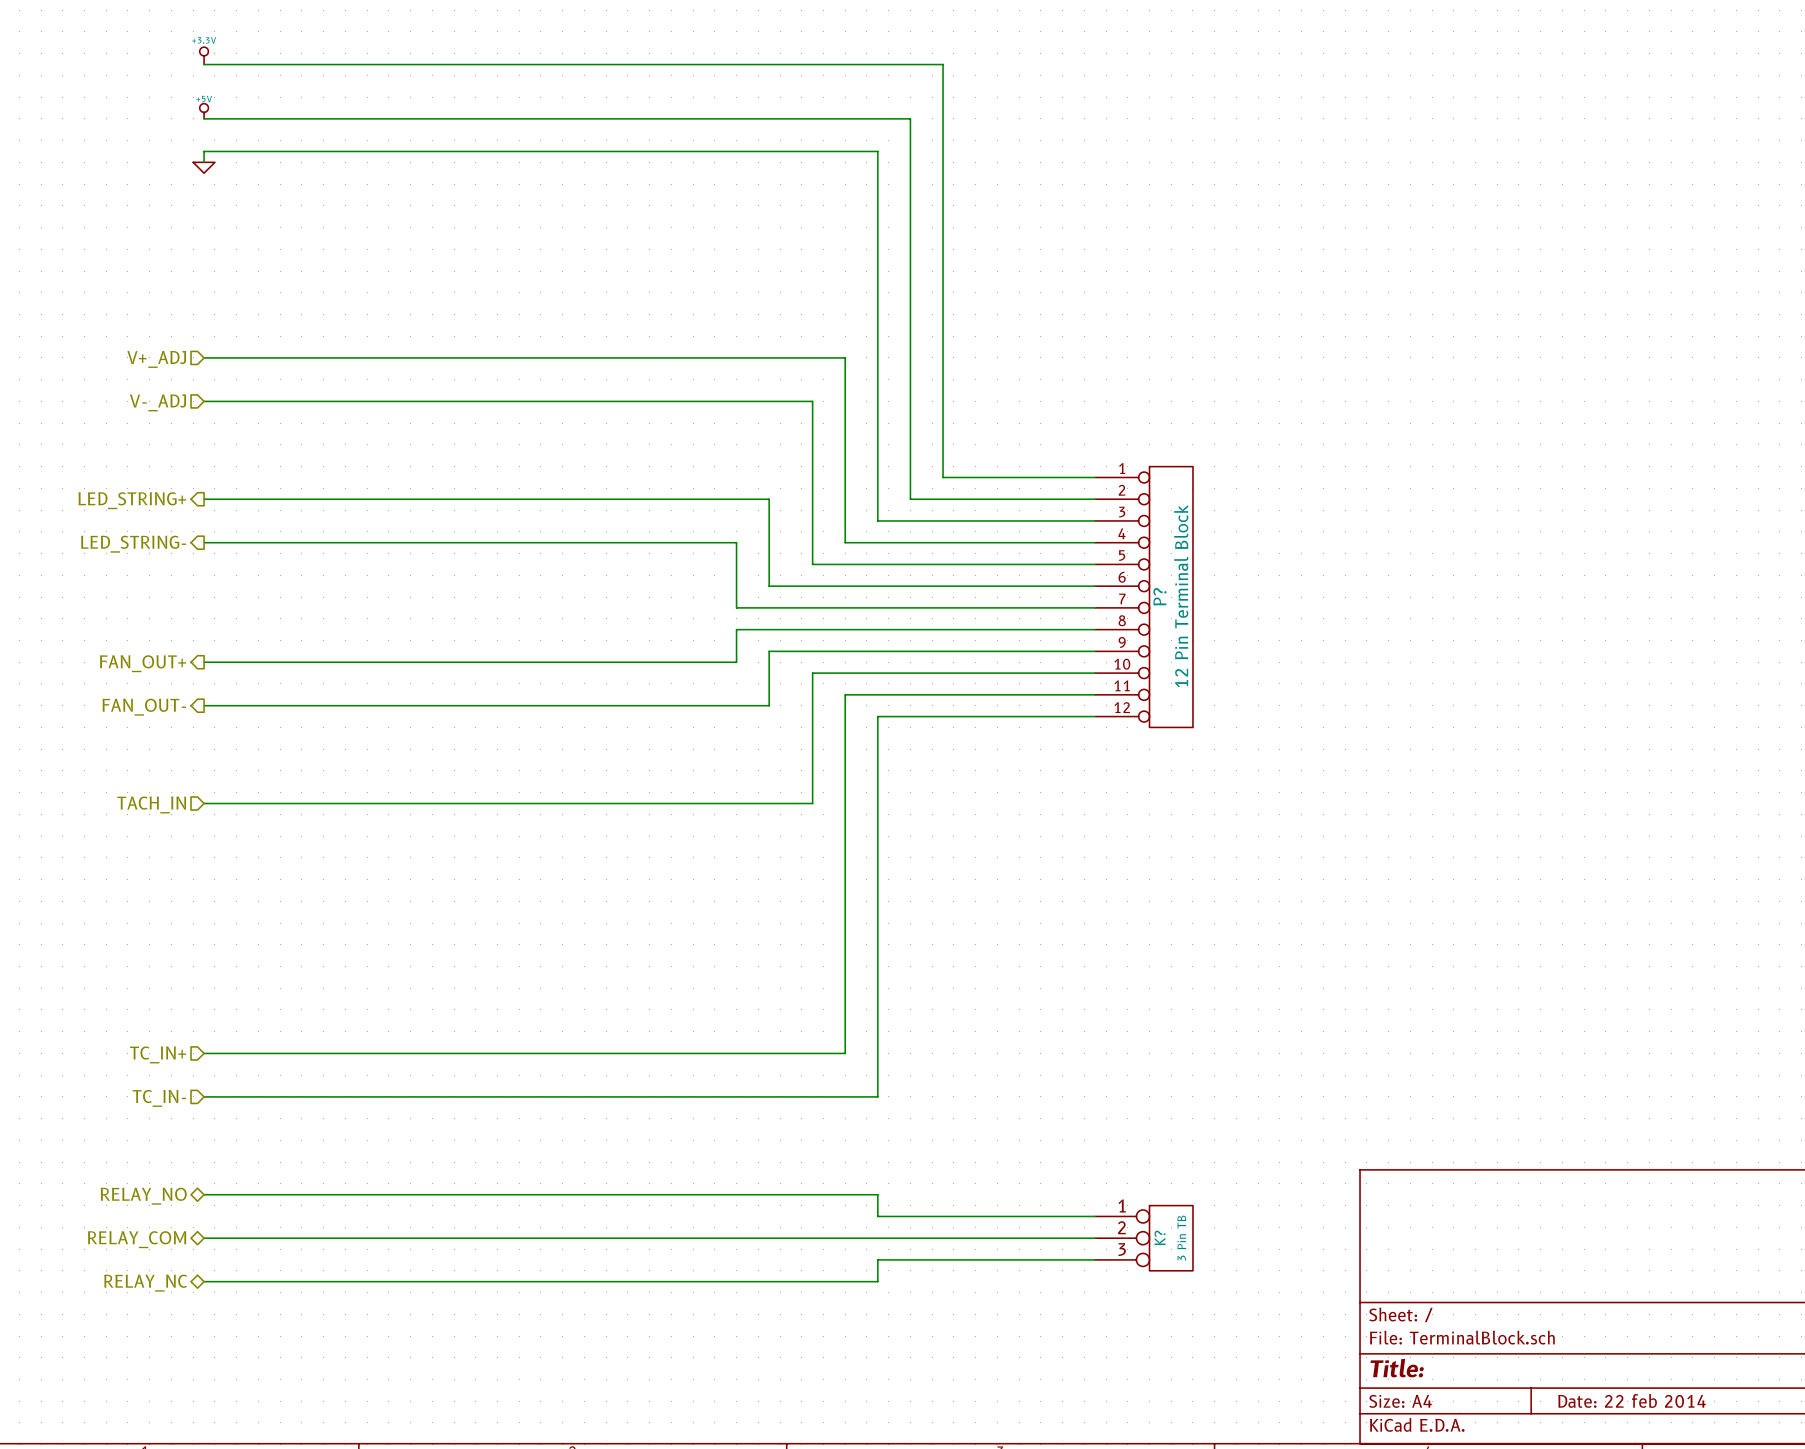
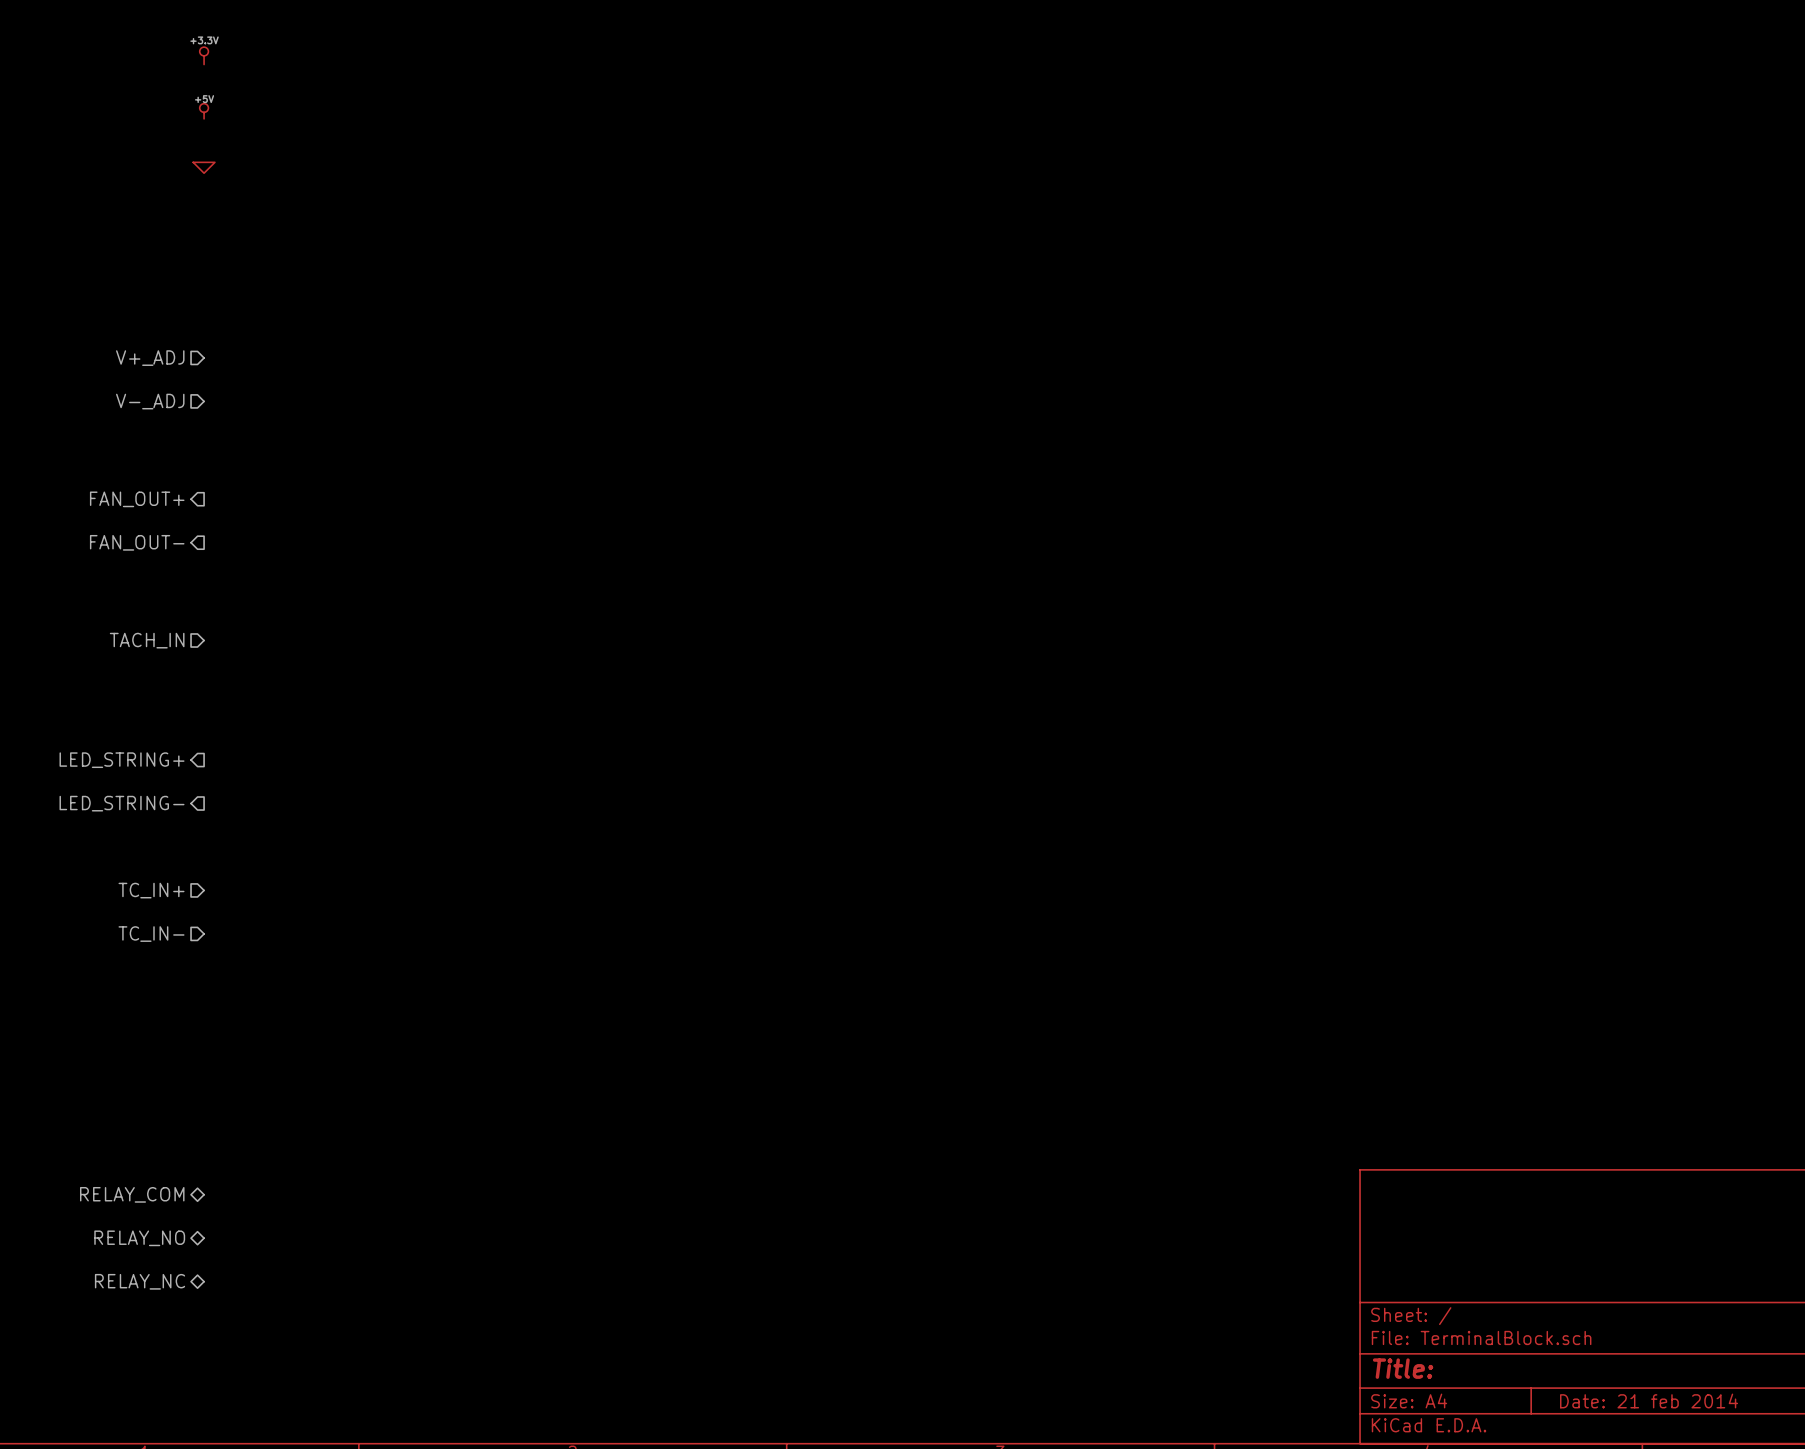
wire: (204, 64) (943, 64) (943, 477) (1095, 477) -> none
wire: (204, 118) (910, 118) (910, 499) (1095, 499) -> none
wire: (204, 162) (204, 151) (877, 151) (877, 520) (1095, 520) -> none
wire: (204, 357) (845, 357) (845, 542) (1095, 542) -> none
wire: (204, 401) (812, 401) (812, 564) (1095, 564) -> none
wire: (204, 499) (769, 499) (769, 586) (1095, 586) -> none
hierarchical label: LED_STRING+ (132, 500) -> FAN_OUT+ (137, 499)
wire: (204, 542) (736, 542) (736, 607) (1095, 607) -> none
hierarchical label: LED_STRING- (133, 544) -> FAN_OUT- (137, 542)
P?: 12 Pin Terminal Block (1144, 597) -> none
wire: (1095, 629) (736, 629) (736, 662) (204, 662) -> none
hierarchical label: none -> TACH_IN (147, 640)
wire: (1095, 651) (769, 651) (769, 705) (204, 705) -> none
hierarchical label: FAN_OUT+ (142, 663) -> none
wire: (1095, 673) (812, 673) (812, 803) (204, 803) -> none
wire: (1095, 694) (845, 694) (845, 1053) (204, 1053) -> none
hierarchical label: FAN_OUT- (144, 707) -> none
wire: (1095, 716) (877, 716) (877, 1096) (204, 1096) -> none
hierarchical label: none -> LED_STRING+ (122, 760)
hierarchical label shape: input (151, 804) -> output (122, 803)
hierarchical label: TACH_IN (151, 804) -> LED_STRING- (122, 803)
hierarchical label position: TC_IN+ (158, 1054) -> TC_IN+ (151, 890)
hierarchical label position: TC_IN- (159, 1098) -> TC_IN- (151, 934)
wire: (204, 1194) (877, 1194) (877, 1216) (1095, 1216) -> none
hierarchical label: RELAY_NO (143, 1196) -> RELAY_COM (132, 1194)
wire: (204, 1238) (1095, 1238) -> none
K?: 3 Pin TB (1144, 1238) -> none
hierarchical label: RELAY_COM (136, 1239) -> RELAY_NO (139, 1238)
wire: (1095, 1259) (877, 1259) (877, 1281) (204, 1281) -> none
title block: Date: 22 feb 2014 (1632, 1400) -> Date: 21 feb 2014 (1649, 1400)

